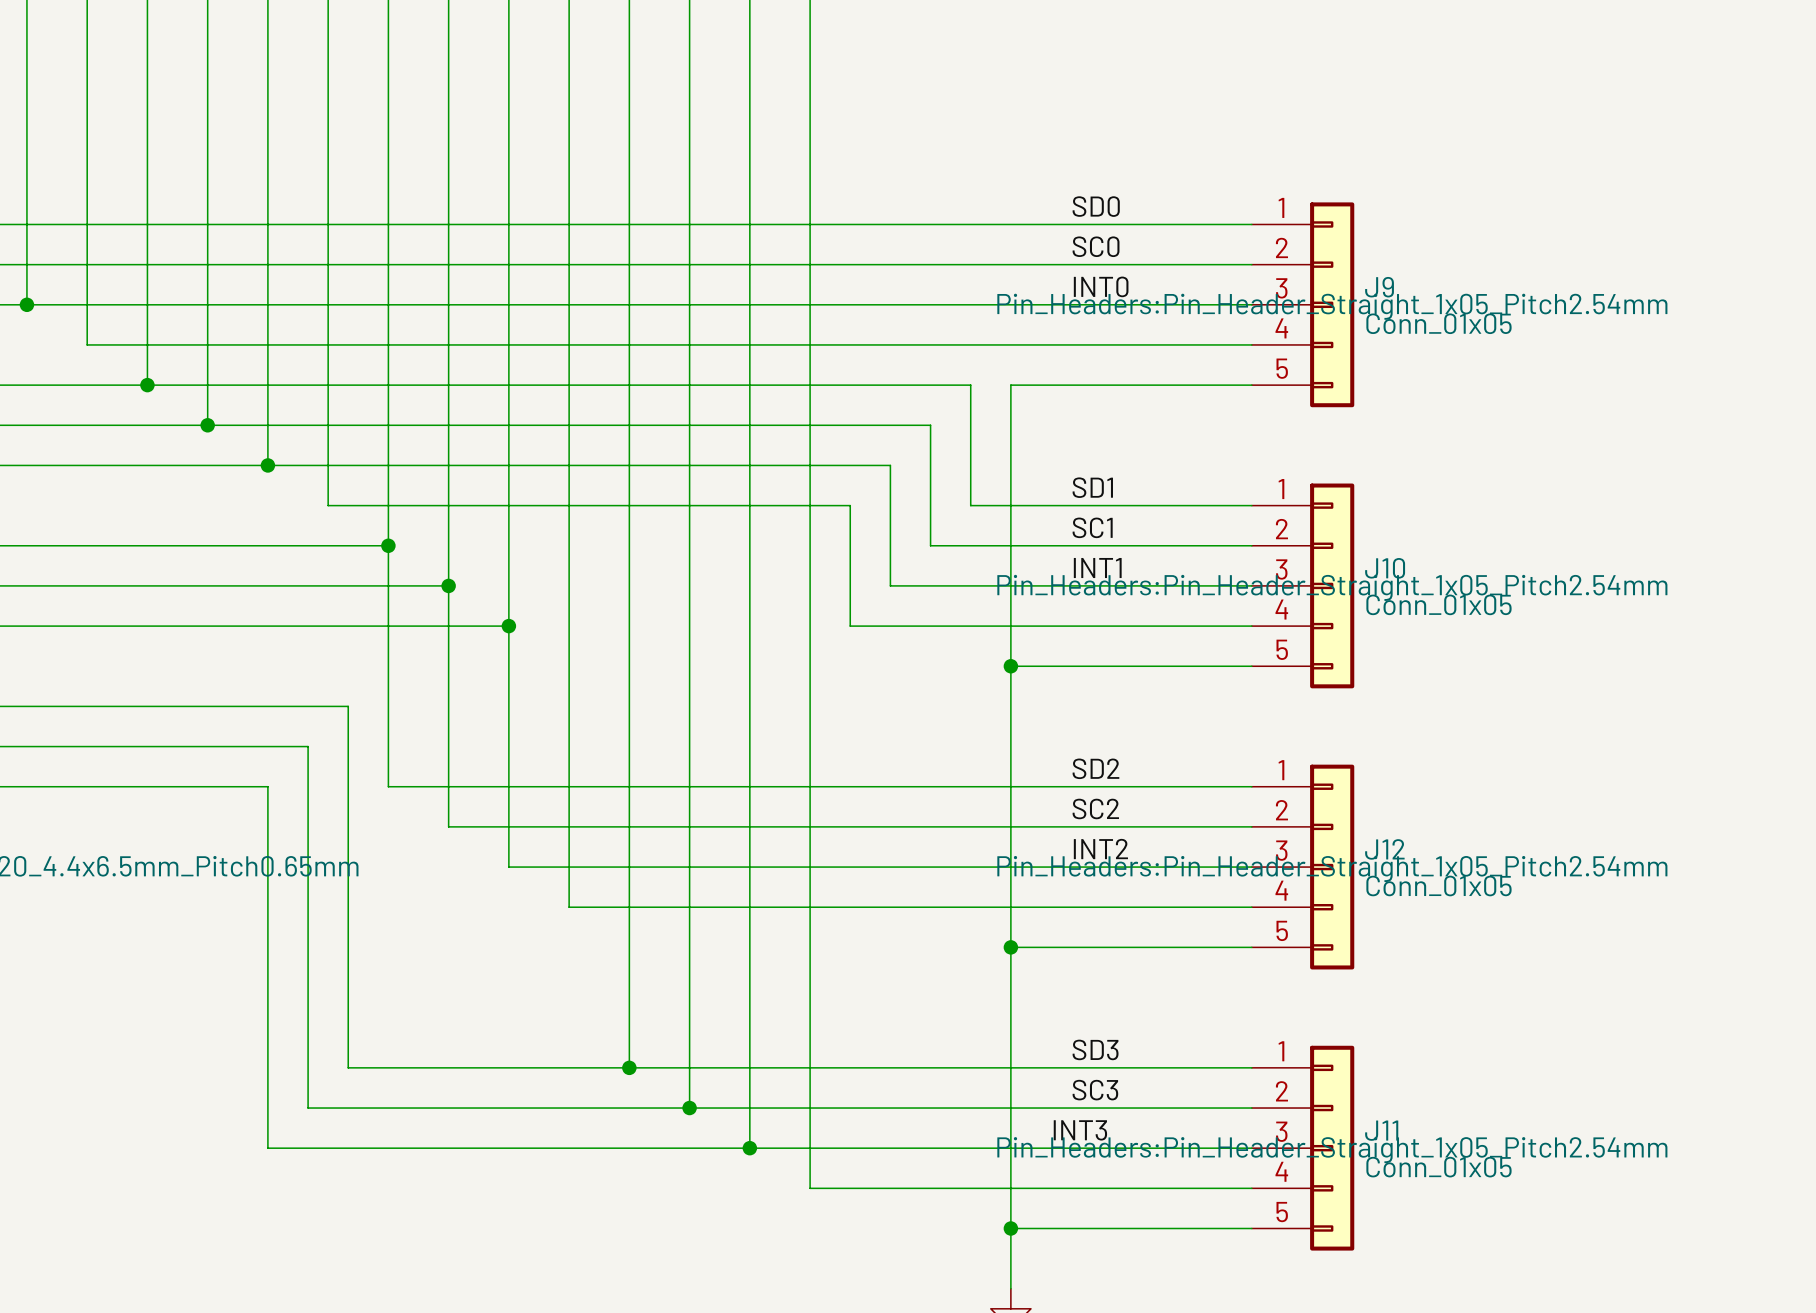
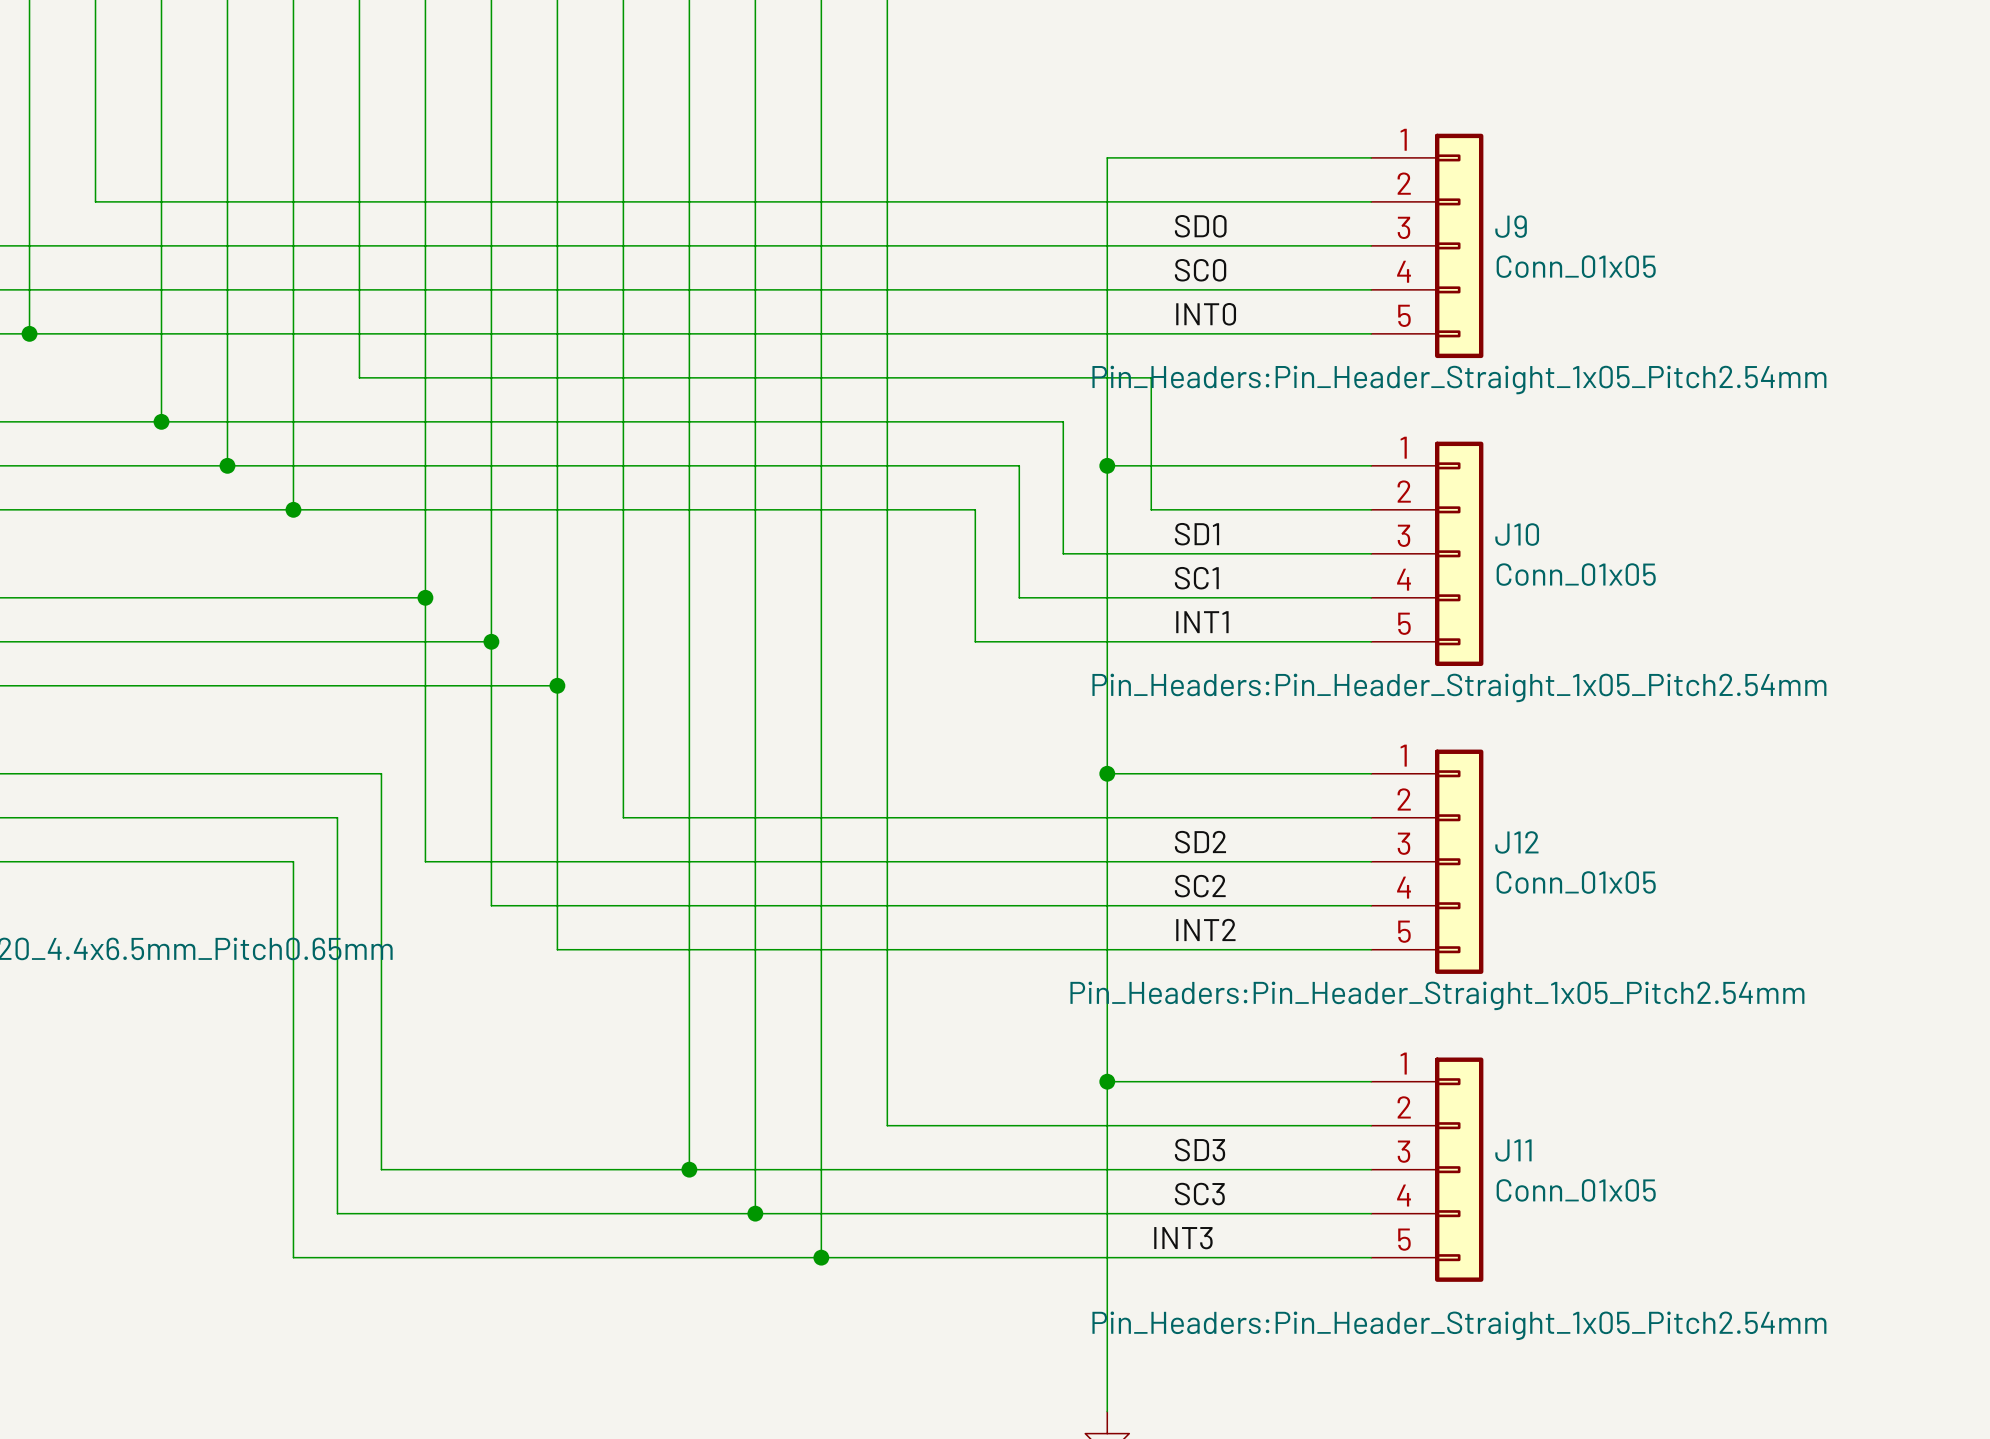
wire: (87, 184) (87, 344) (328, 344) (328, 505) (850, 505) (850, 626) (1251, 626) -> (95, 201) (1371, 201)
J9 position: (1303, 304) -> (1427, 245)
J9 text position: Pin_Headers:Pin_Header_Straight_1x05_Pitch2.54mm (1332, 306) -> Pin_Headers:Pin_Header_Straight_1x05_Pitch2.54mm (1459, 380)
wire: (1051, 344) (1251, 344) -> (1151, 377) (1151, 509) (1371, 509)
wire: (1010, 385) (1251, 385) -> (1107, 421) (1107, 157) (1371, 157)
wire: none -> (1107, 465) (1371, 465)
junction: none -> (1107, 465)
J10 position: (1303, 585) -> (1427, 553)
J10 text position: Pin_Headers:Pin_Header_Straight_1x05_Pitch2.54mm (1332, 587) -> Pin_Headers:Pin_Header_Straight_1x05_Pitch2.54mm (1459, 687)
wire: (1010, 666) (1251, 666) -> (1107, 773) (1371, 773)
junction position: (1010, 666) -> (1107, 773)
wire: (569, 746) (569, 907) (1251, 907) -> (623, 817) (1371, 817)
J12 position: (1303, 867) -> (1427, 861)
J12 text position: Pin_Headers:Pin_Header_Straight_1x05_Pitch2.54mm (1332, 869) -> Pin_Headers:Pin_Header_Straight_1x05_Pitch2.54mm (1437, 995)
wire: (1010, 947) (1251, 947) -> (1107, 1081) (1371, 1081)
junction position: (1010, 947) -> (1107, 1081)
wire: (810, 1027) (810, 1188) (1251, 1188) -> (887, 1125) (1371, 1125)
J11 position: (1303, 1148) -> (1427, 1169)
J11 text position: Pin_Headers:Pin_Header_Straight_1x05_Pitch2.54mm (1332, 1150) -> Pin_Headers:Pin_Header_Straight_1x05_Pitch2.54mm (1459, 1325)
wire: (1010, 1228) (1251, 1228) -> none
junction: (1010, 1228) -> none

